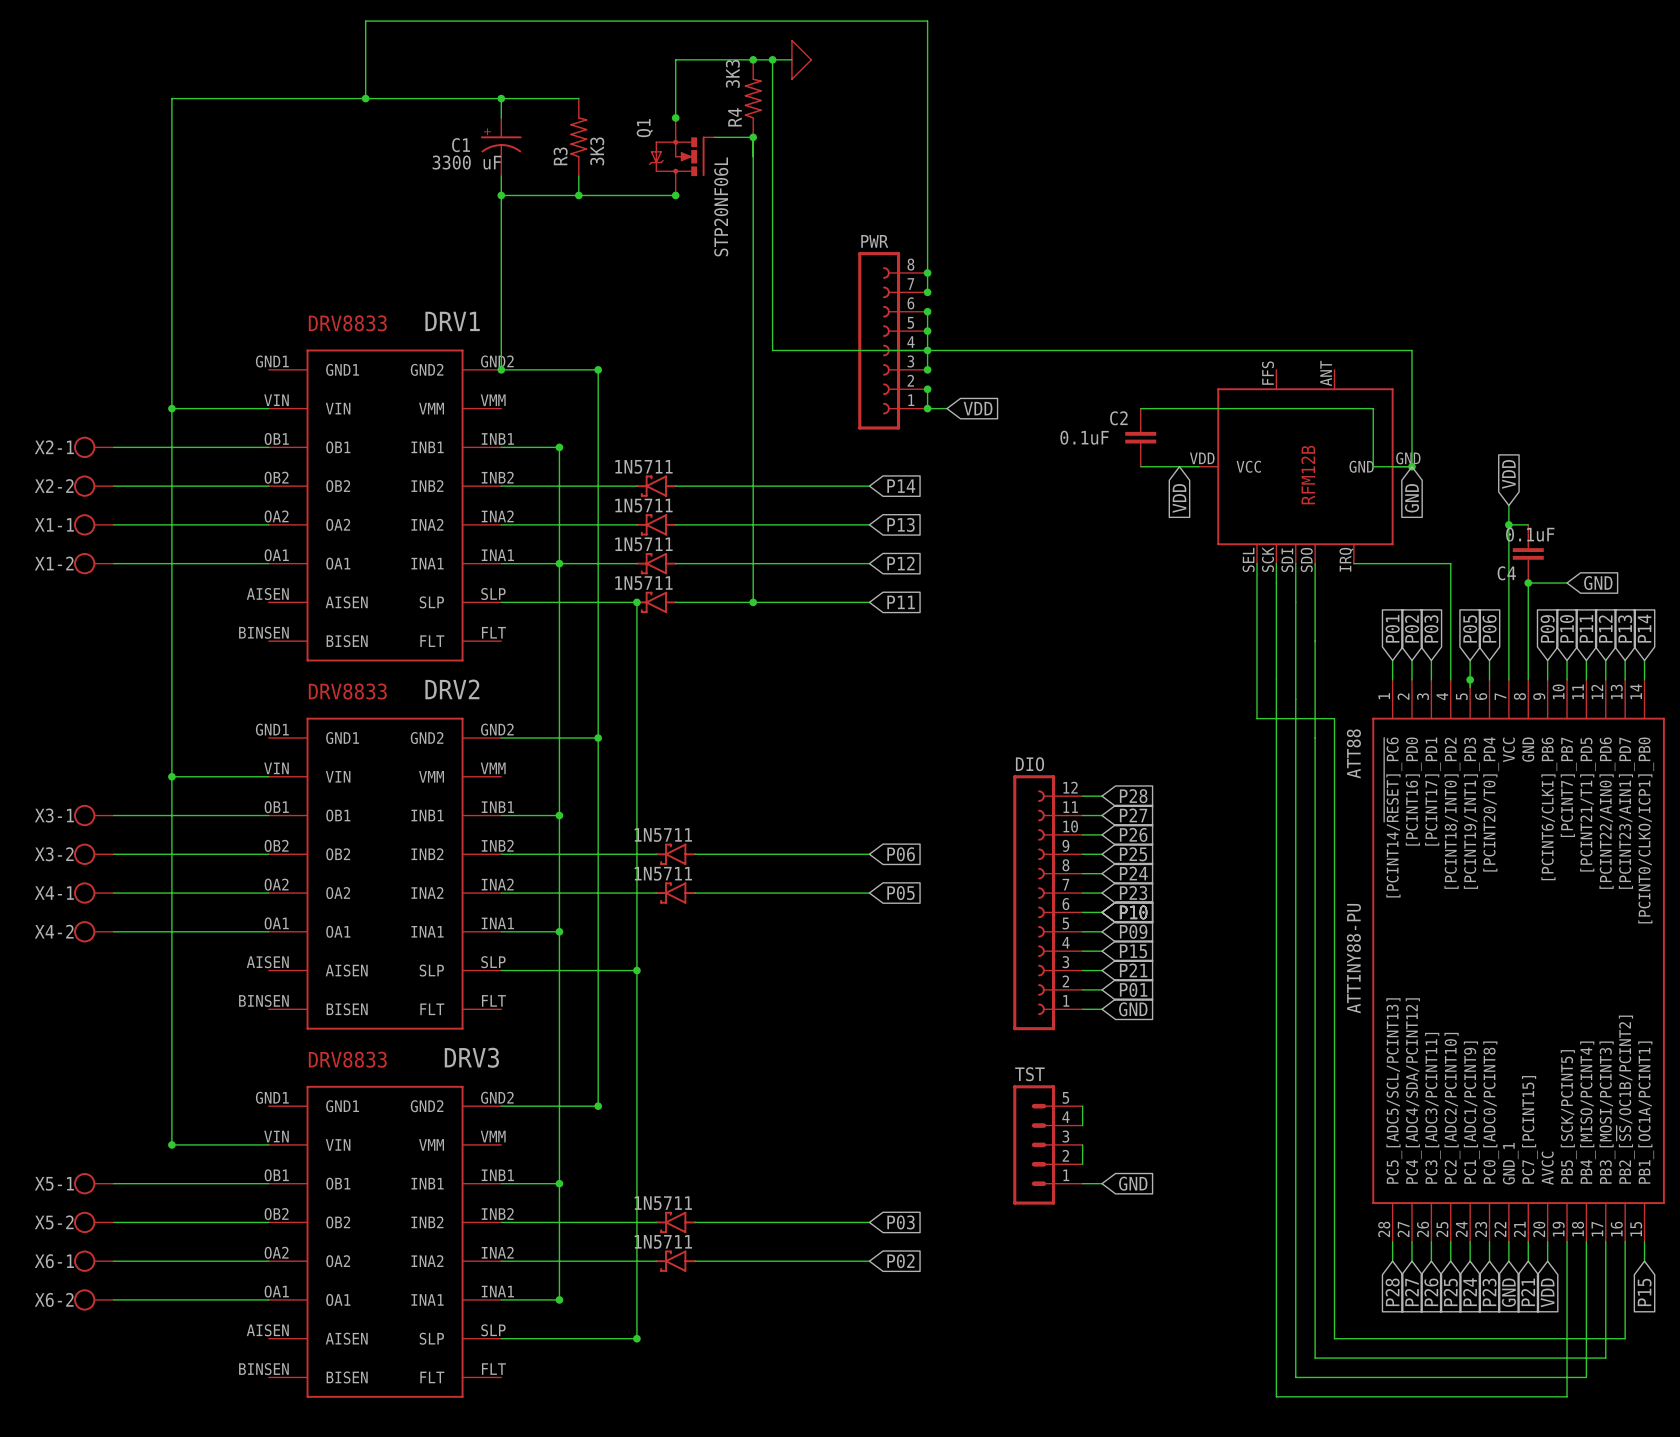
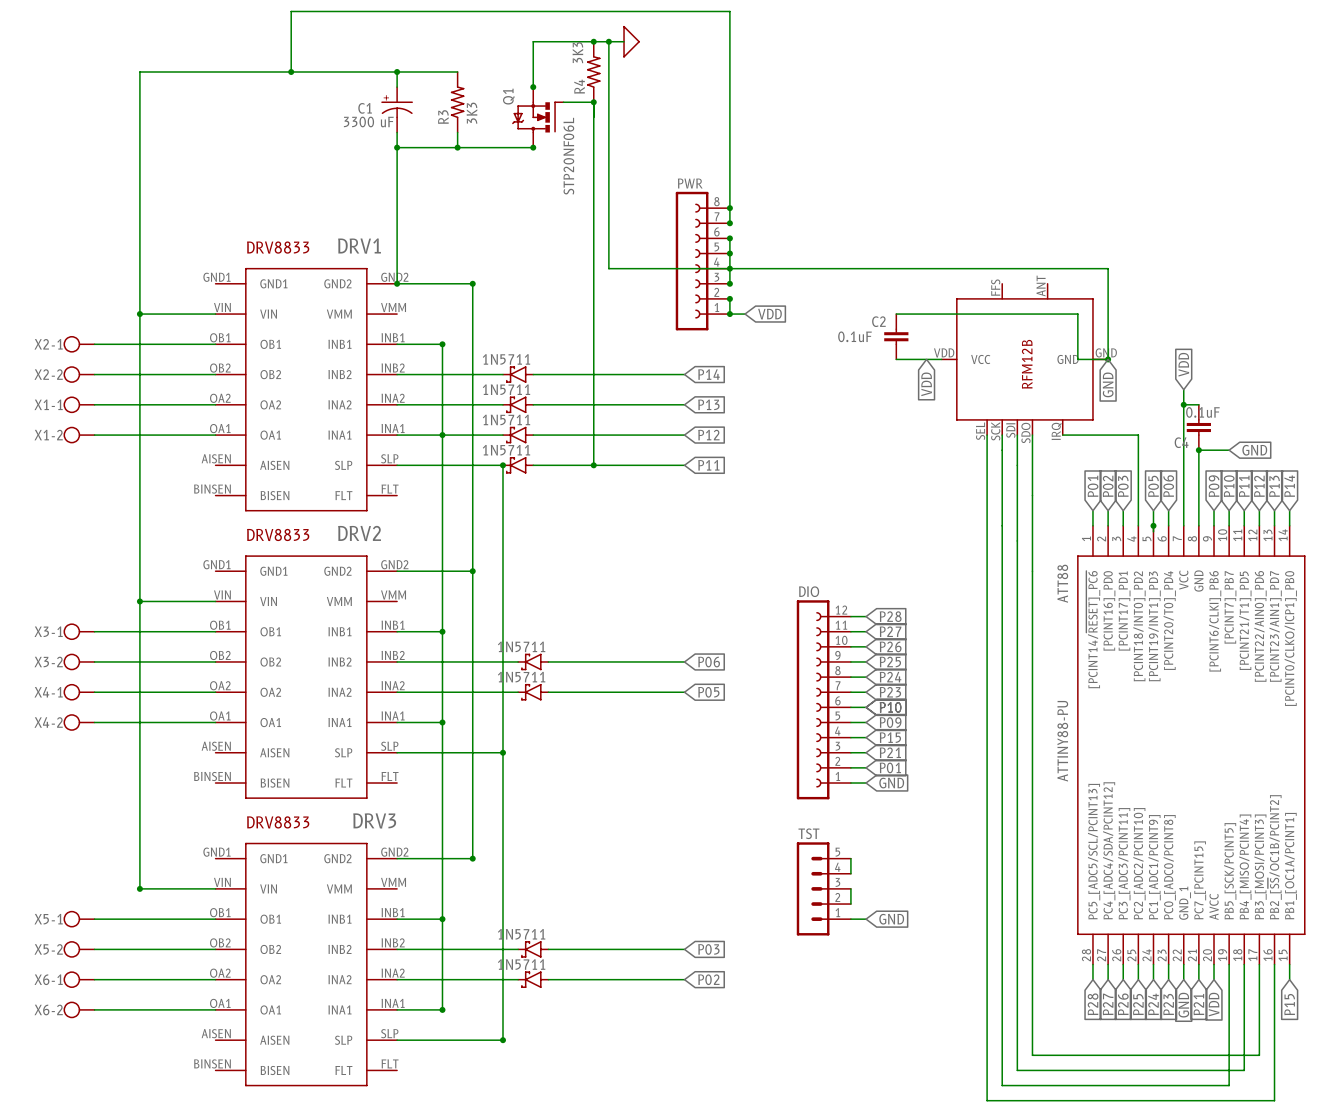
wire: (1256, 718) (1334, 718) (1334, 1338) (1625, 1338) -> (987, 556) (987, 1100) (1274, 1100) (1274, 1040)

